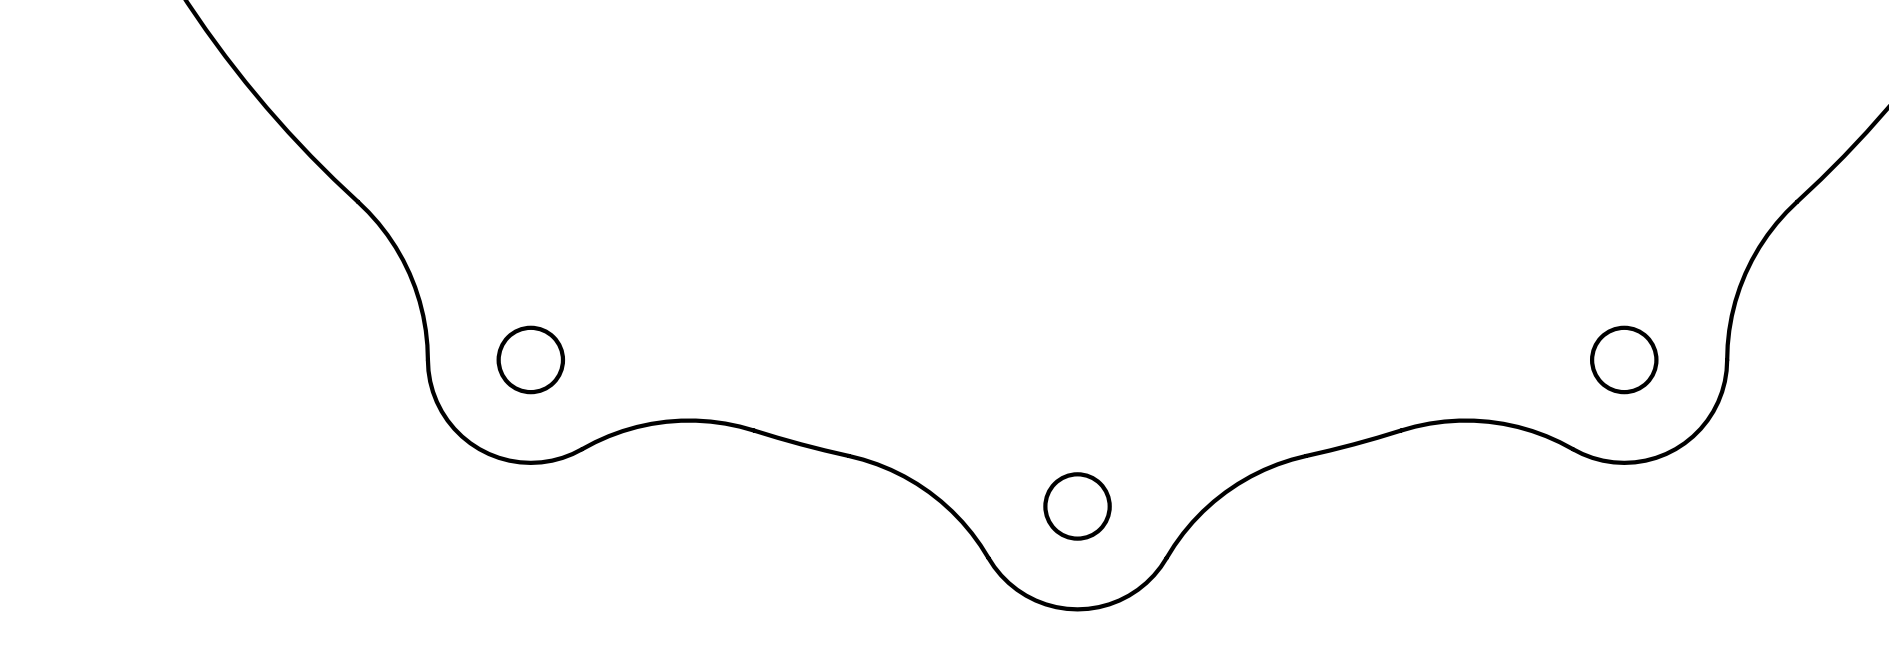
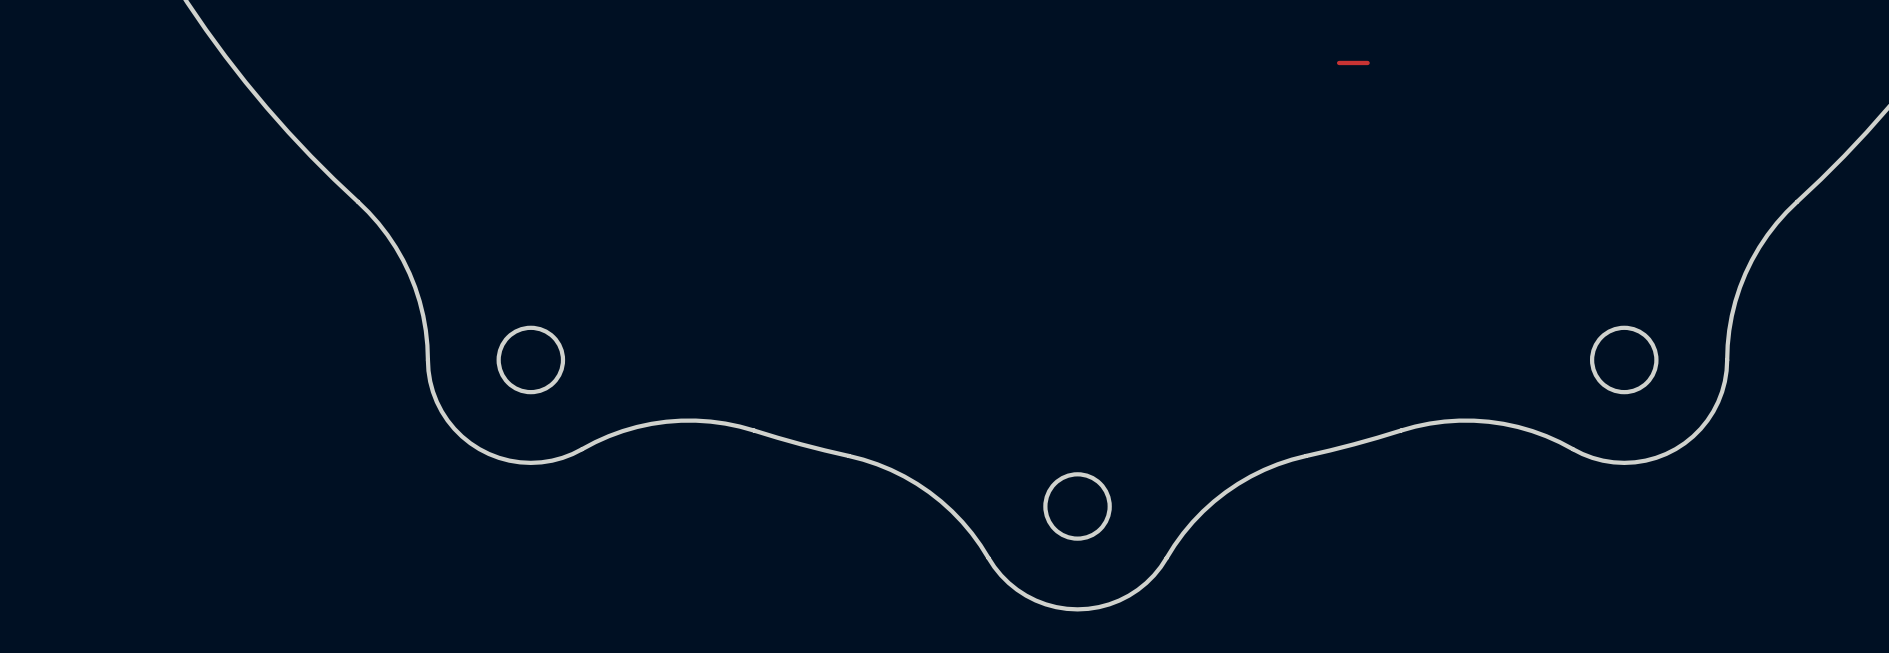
track: none -> (1339, 62) (1367, 62)

